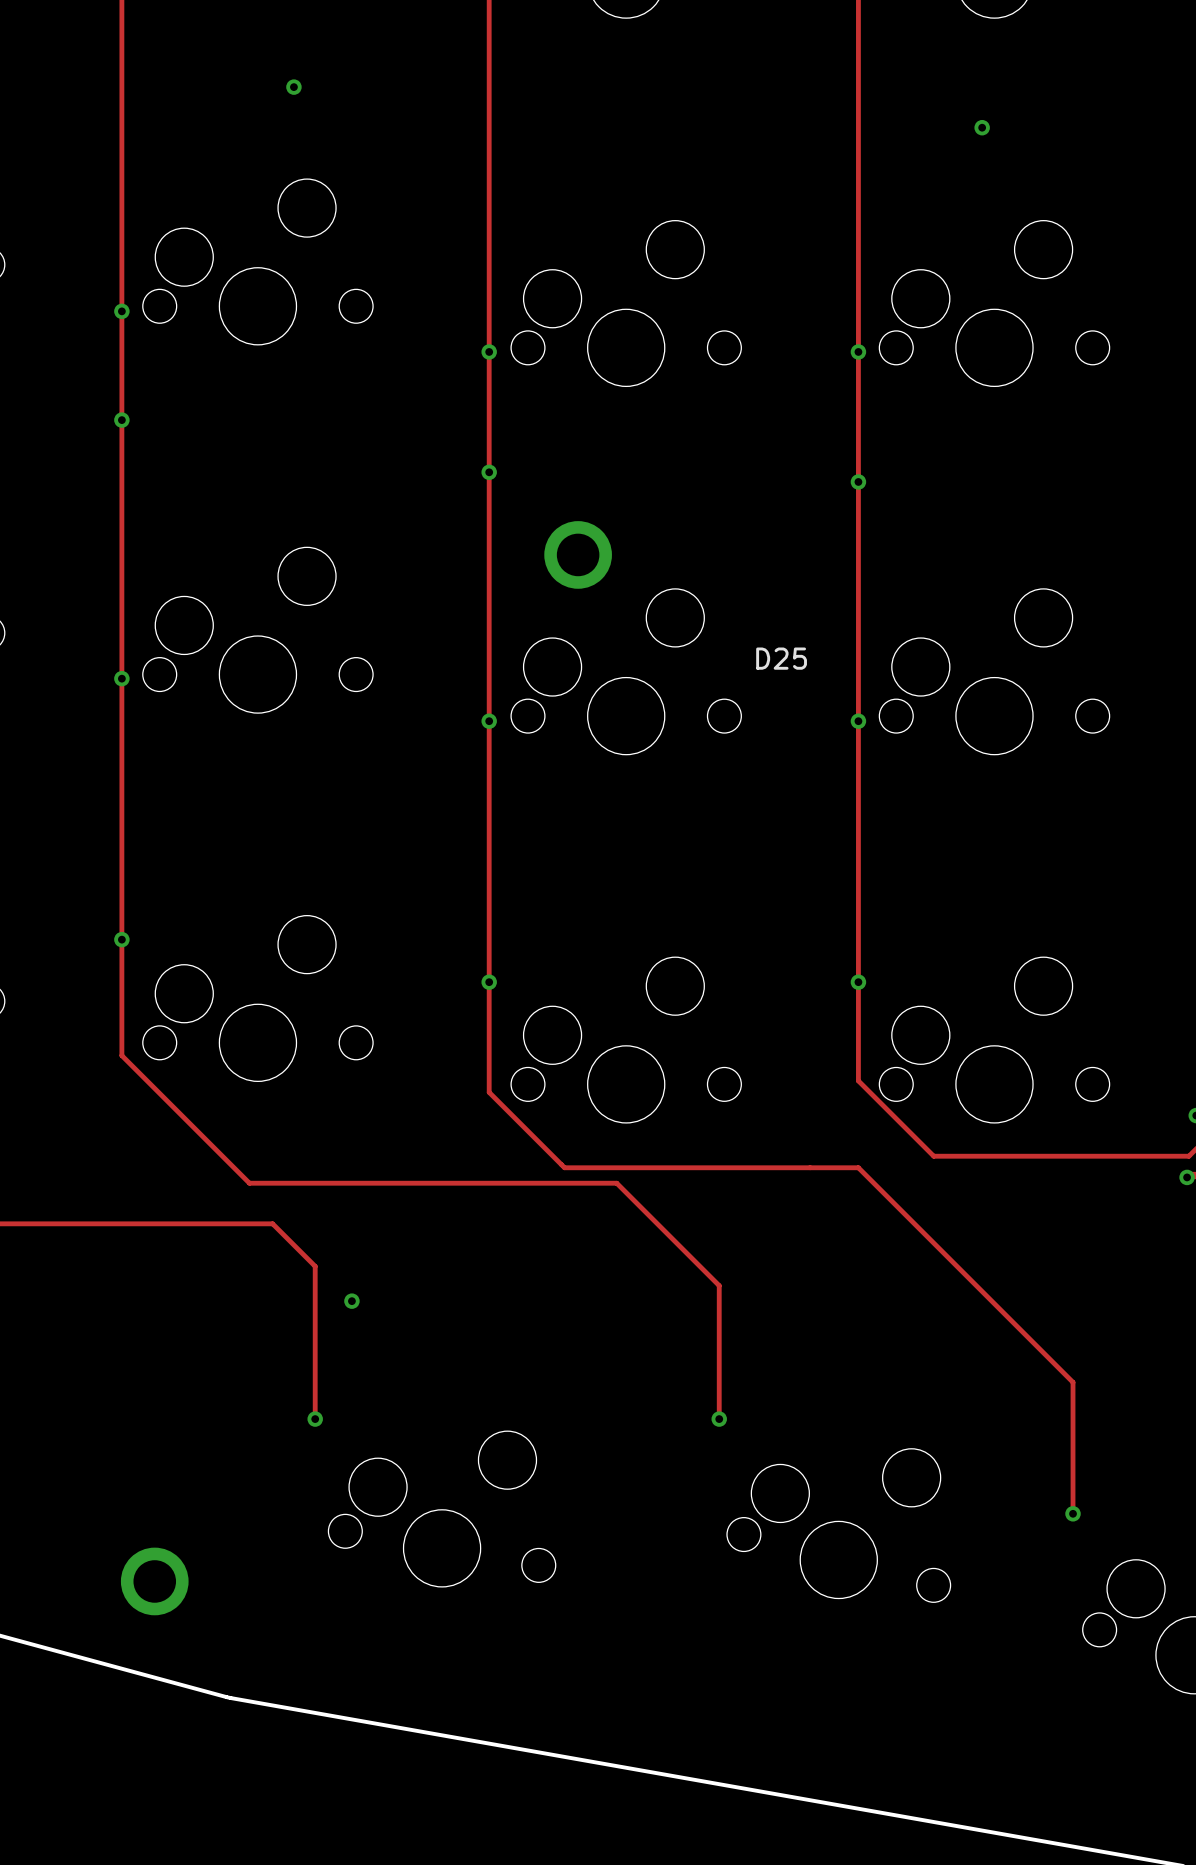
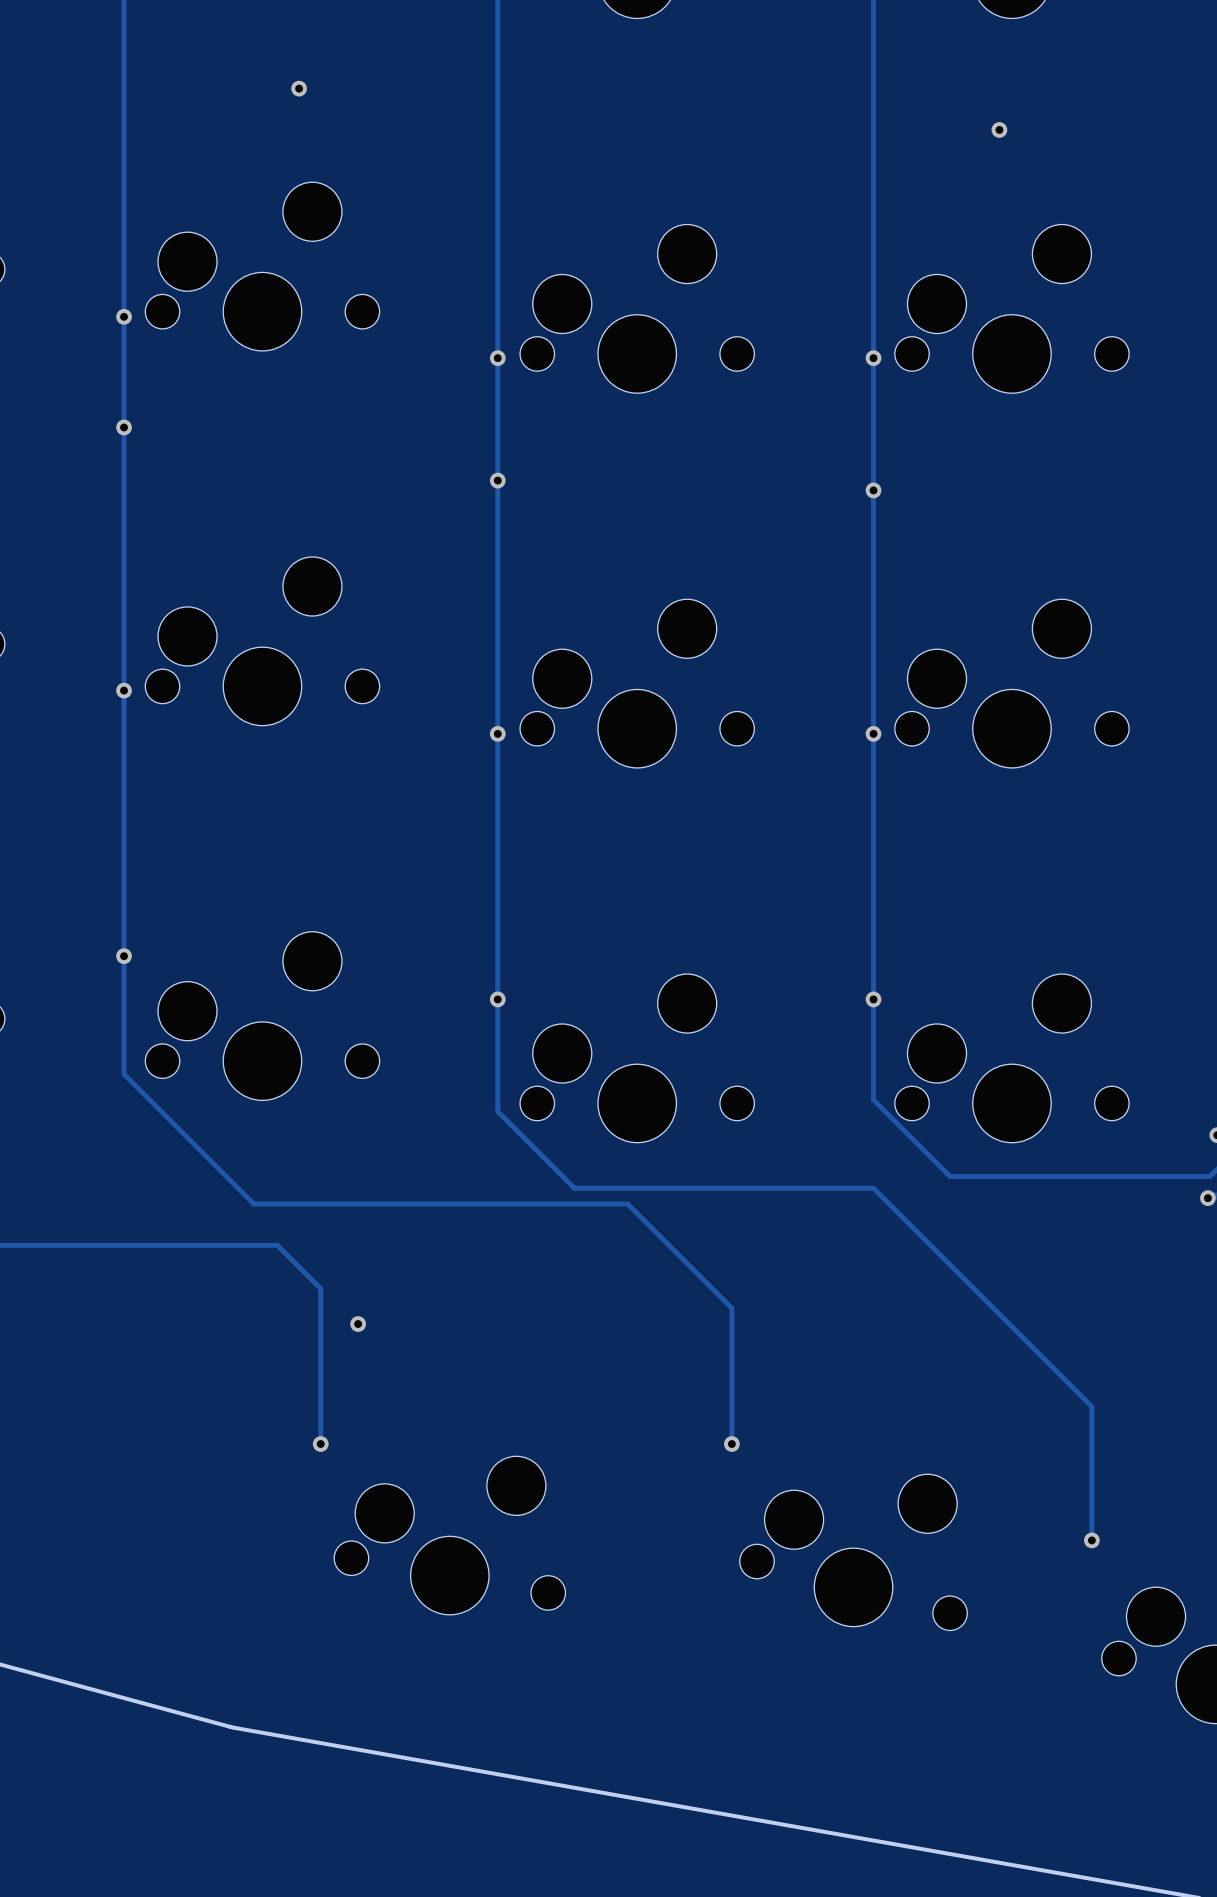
part: (578, 554) -> none
D25: (781, 658) -> none
part: (154, 1581) -> none

